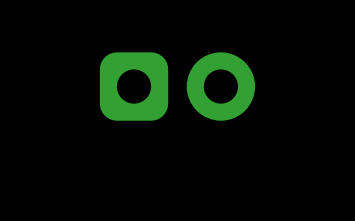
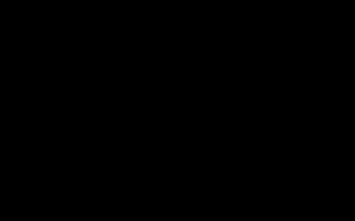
part: (177, 86) -> none

